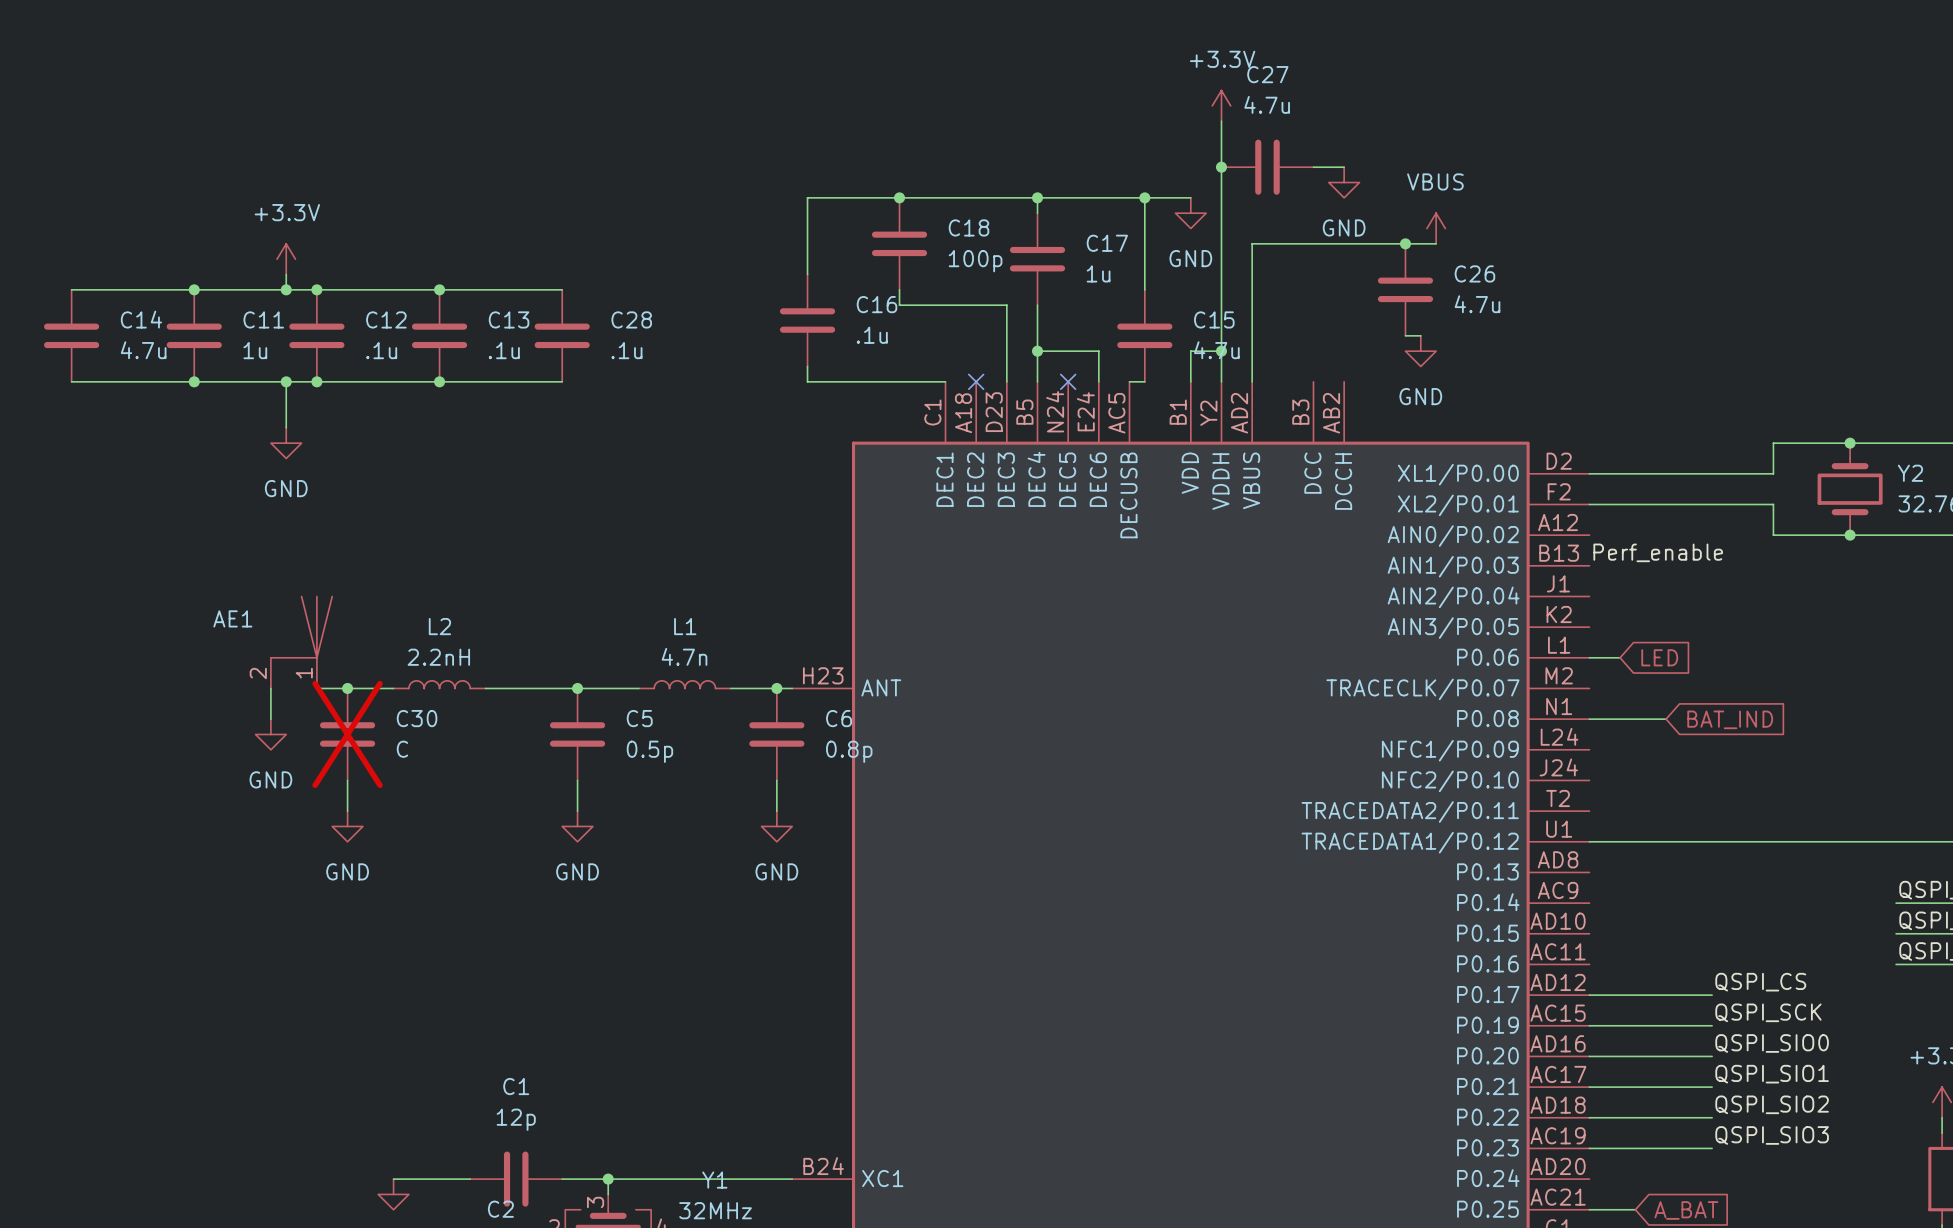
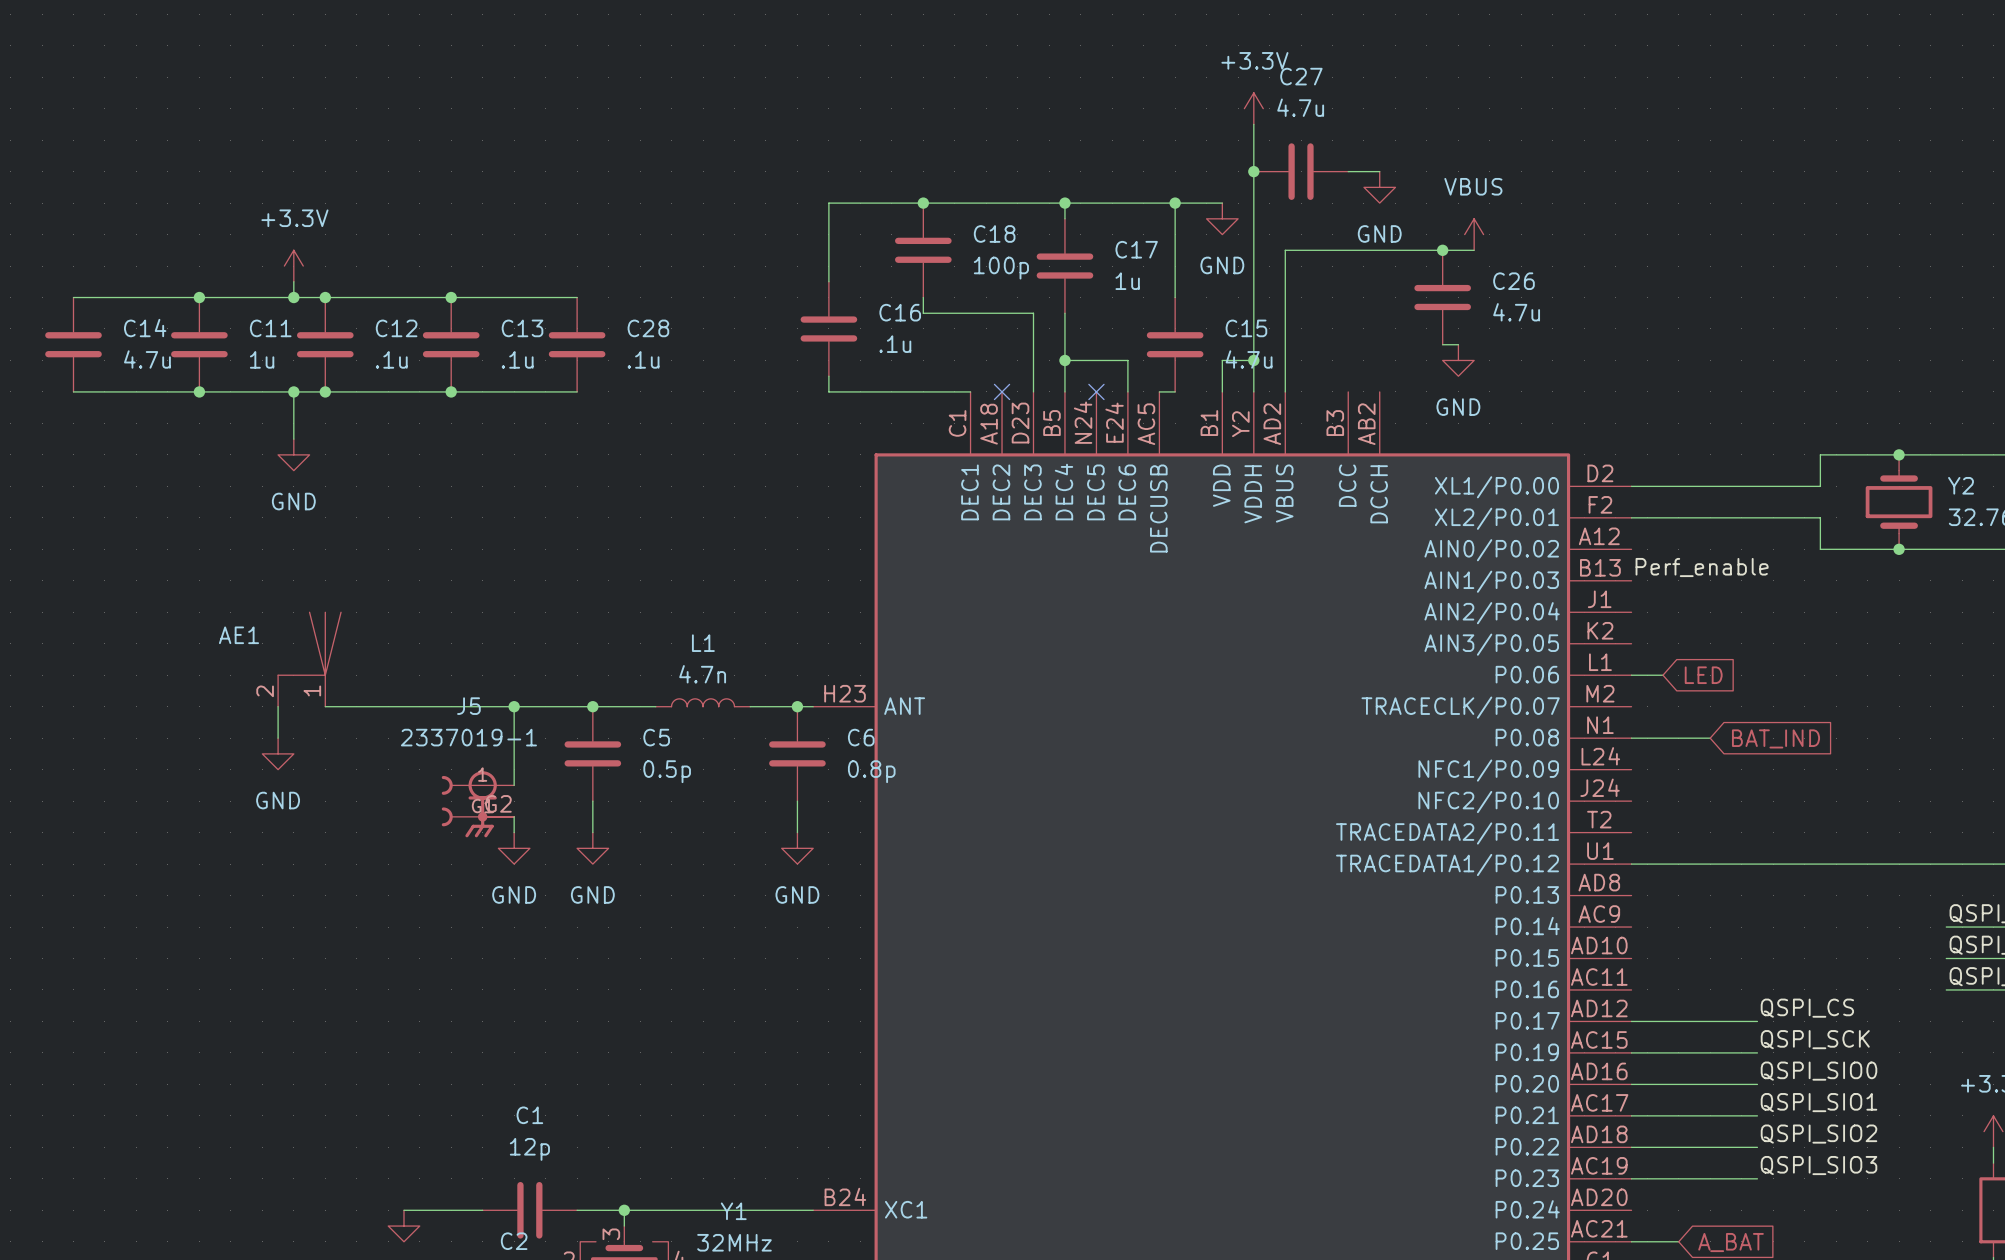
L2: 2.2nH (439, 684) -> none
junction: (347, 688) -> none
wire: none -> (403, 706) (498, 706)
wire: none -> (514, 706) (514, 785)
junction: none -> (514, 706)
C30: C (347, 734) -> none
wire: (347, 780) (347, 811) -> none
J5: none -> 2337019-1 (477, 804)
wire: none -> (514, 816) (514, 832)
power symbol position: GND (347, 826) -> GND (514, 848)

